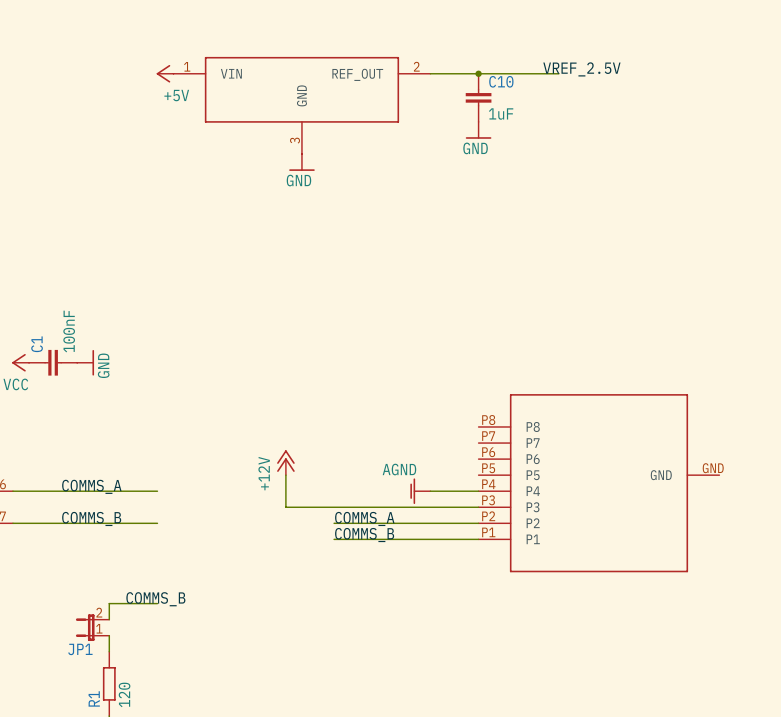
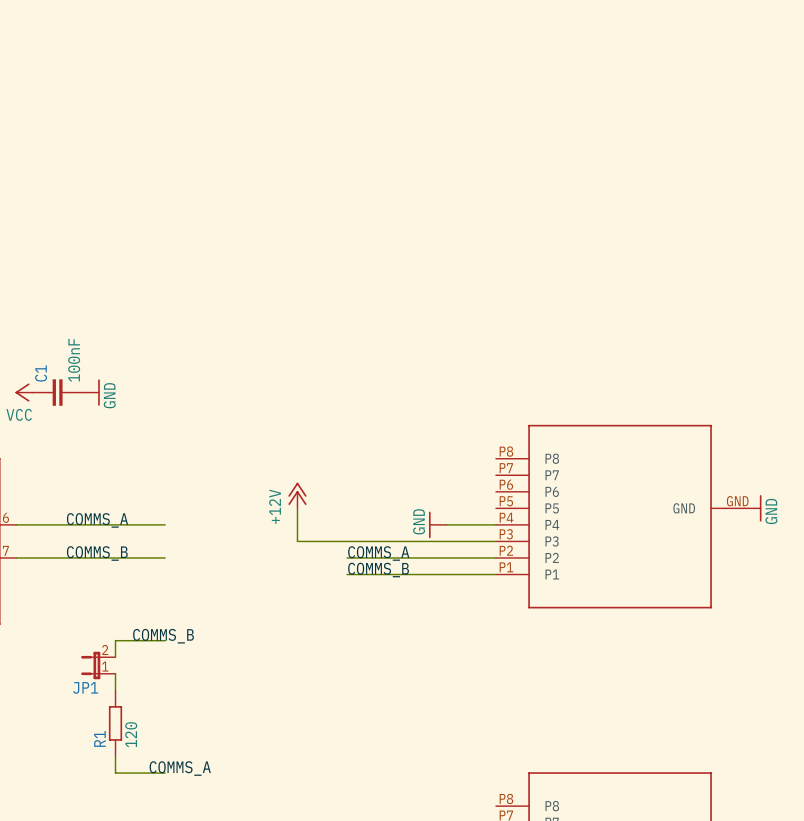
label: VREF_2.5V (581, 69) -> none
power symbol: +5V (165, 73) -> none
wire: (430, 73) (558, 73) -> none
junction: (478, 73) -> none
C10: 1uF (478, 97) -> none
part: (301, 105) -> none
power symbol: GND (478, 130) -> none
power symbol: GND (301, 162) -> none
power symbol: none -> GND (752, 508)
power symbol: AGND (420, 491) -> GND (437, 524)

